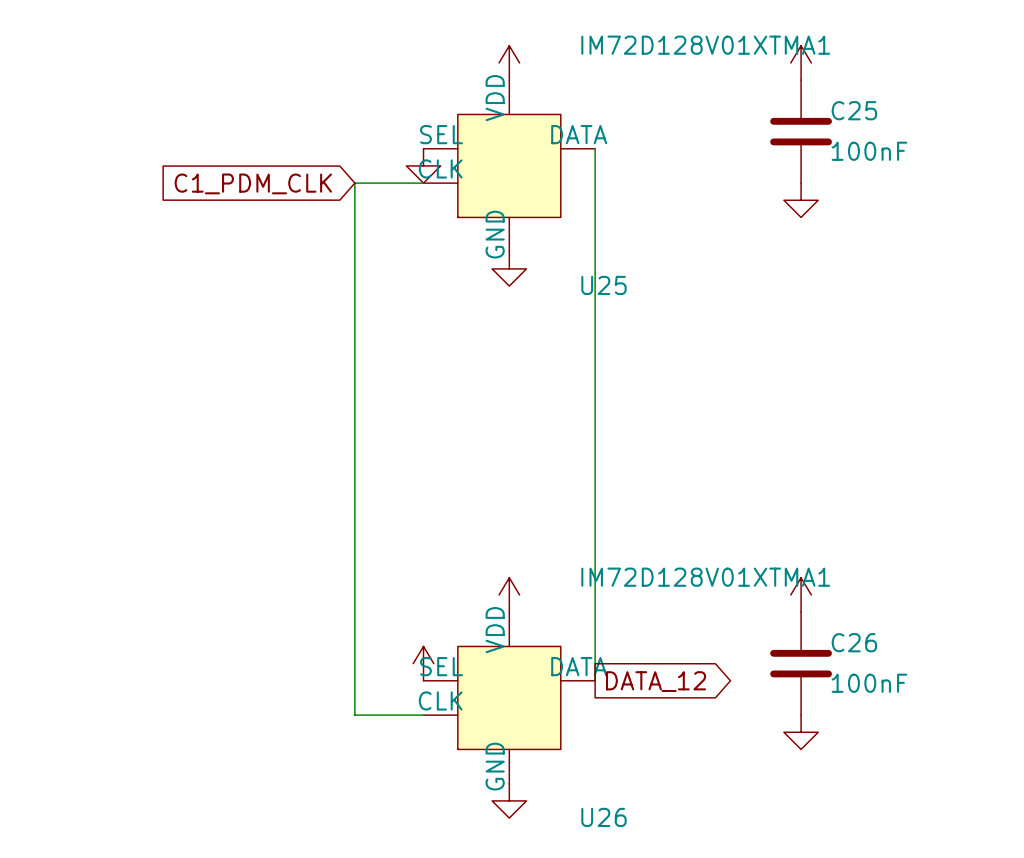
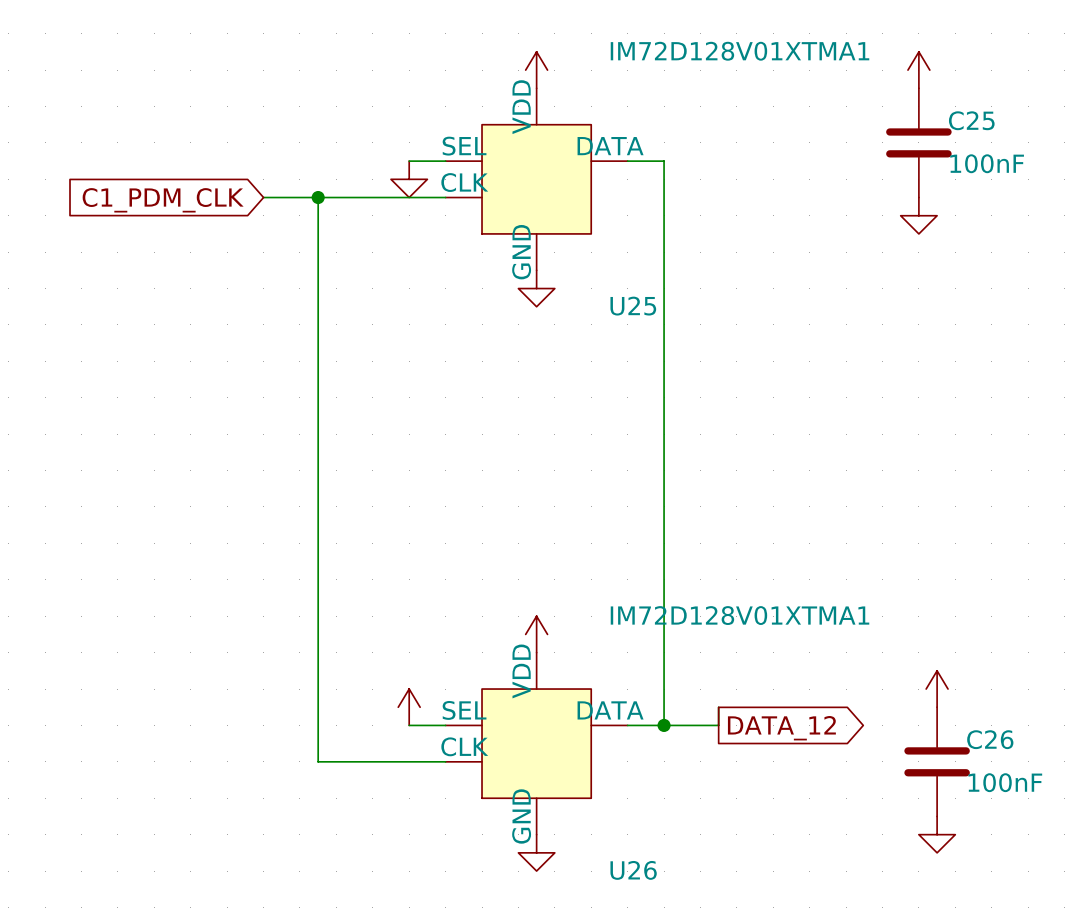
power symbol position: (801, 62) -> (918, 70)
C25 position: (801, 131) -> (918, 142)
wire: none -> (409, 161) (445, 161)
wire: (595, 148) (595, 680) -> (627, 161) (664, 161) (664, 725)
power symbol position: (423, 165) -> (409, 179)
wire: none -> (263, 197) (372, 197)
global label position: C1_PDM_CLK (253, 183) -> C1_PDM_CLK (163, 200)
junction: none -> (318, 197)
wire: (354, 183) (354, 715) -> (318, 197) (318, 761) (372, 761)
power symbol position: (801, 200) -> (918, 215)
power symbol position: (801, 594) -> (937, 689)
power symbol position: (423, 663) -> (409, 707)
wire: none -> (718, 707) (718, 725) (627, 725)
C26 position: (801, 663) -> (937, 761)
wire: none -> (409, 725) (445, 725)
junction: none -> (664, 725)
global label position: DATA_12 (656, 681) -> DATA_12 (781, 728)
power symbol position: (801, 732) -> (937, 834)

